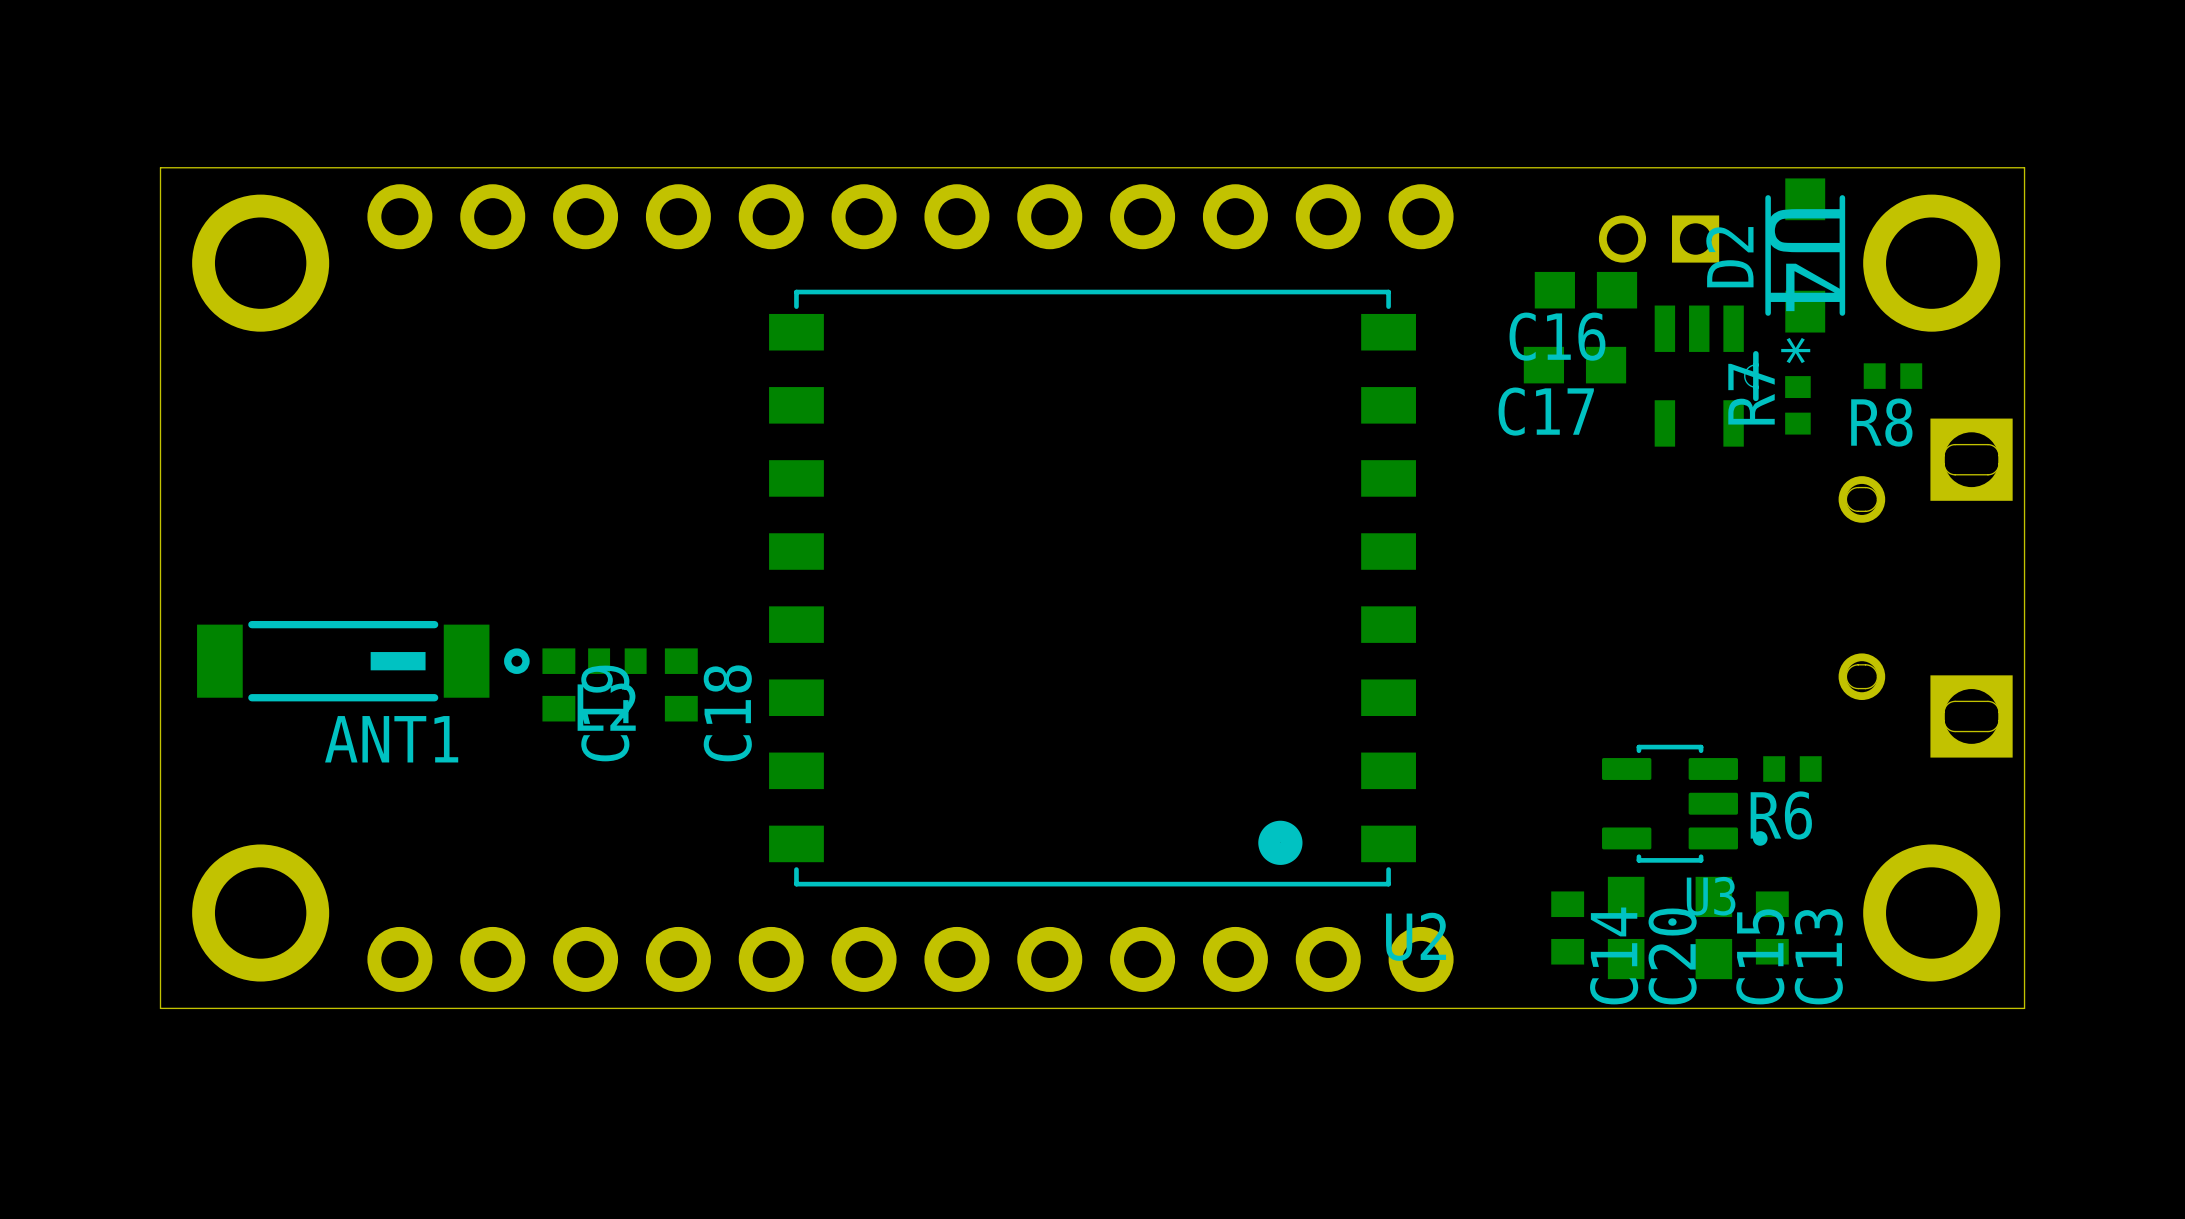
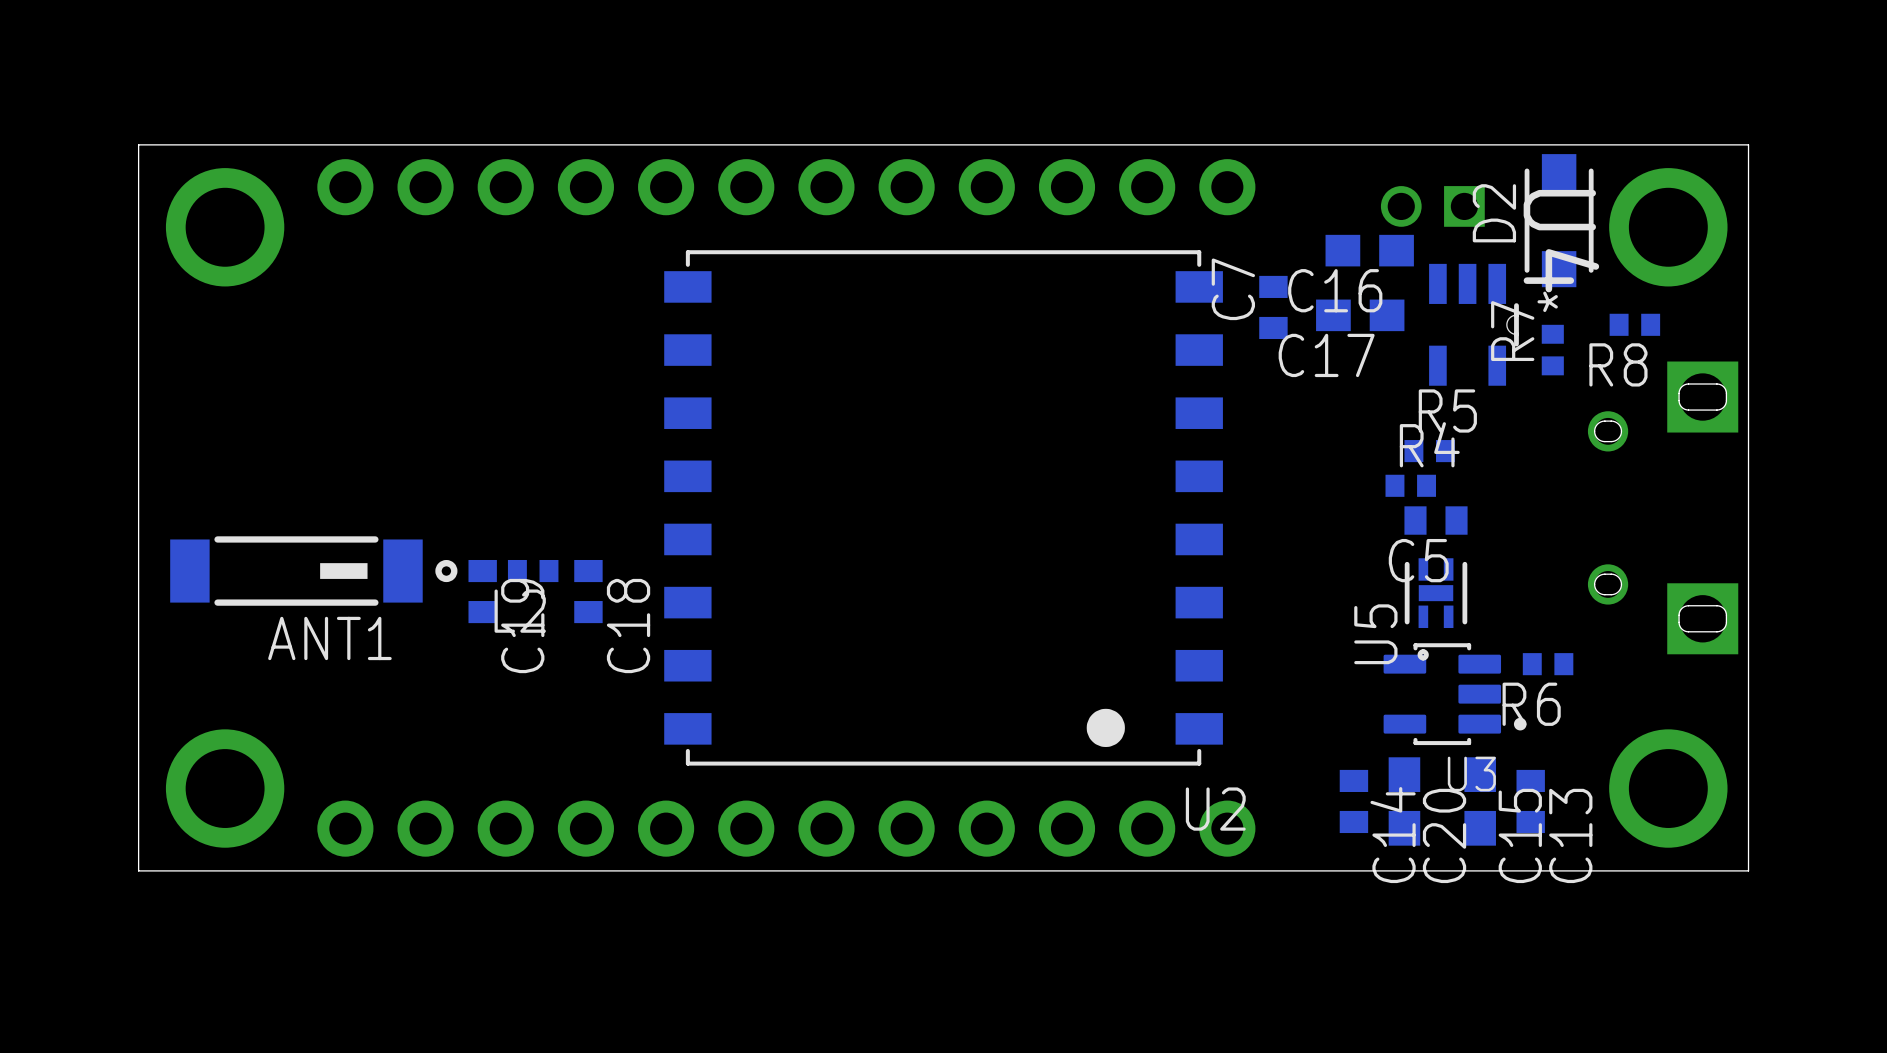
C7: none -> (1273, 307)
R5: none -> (1429, 451)
R4: none -> (1410, 485)
C5: none -> (1436, 520)
U5: none -> (1436, 609)

